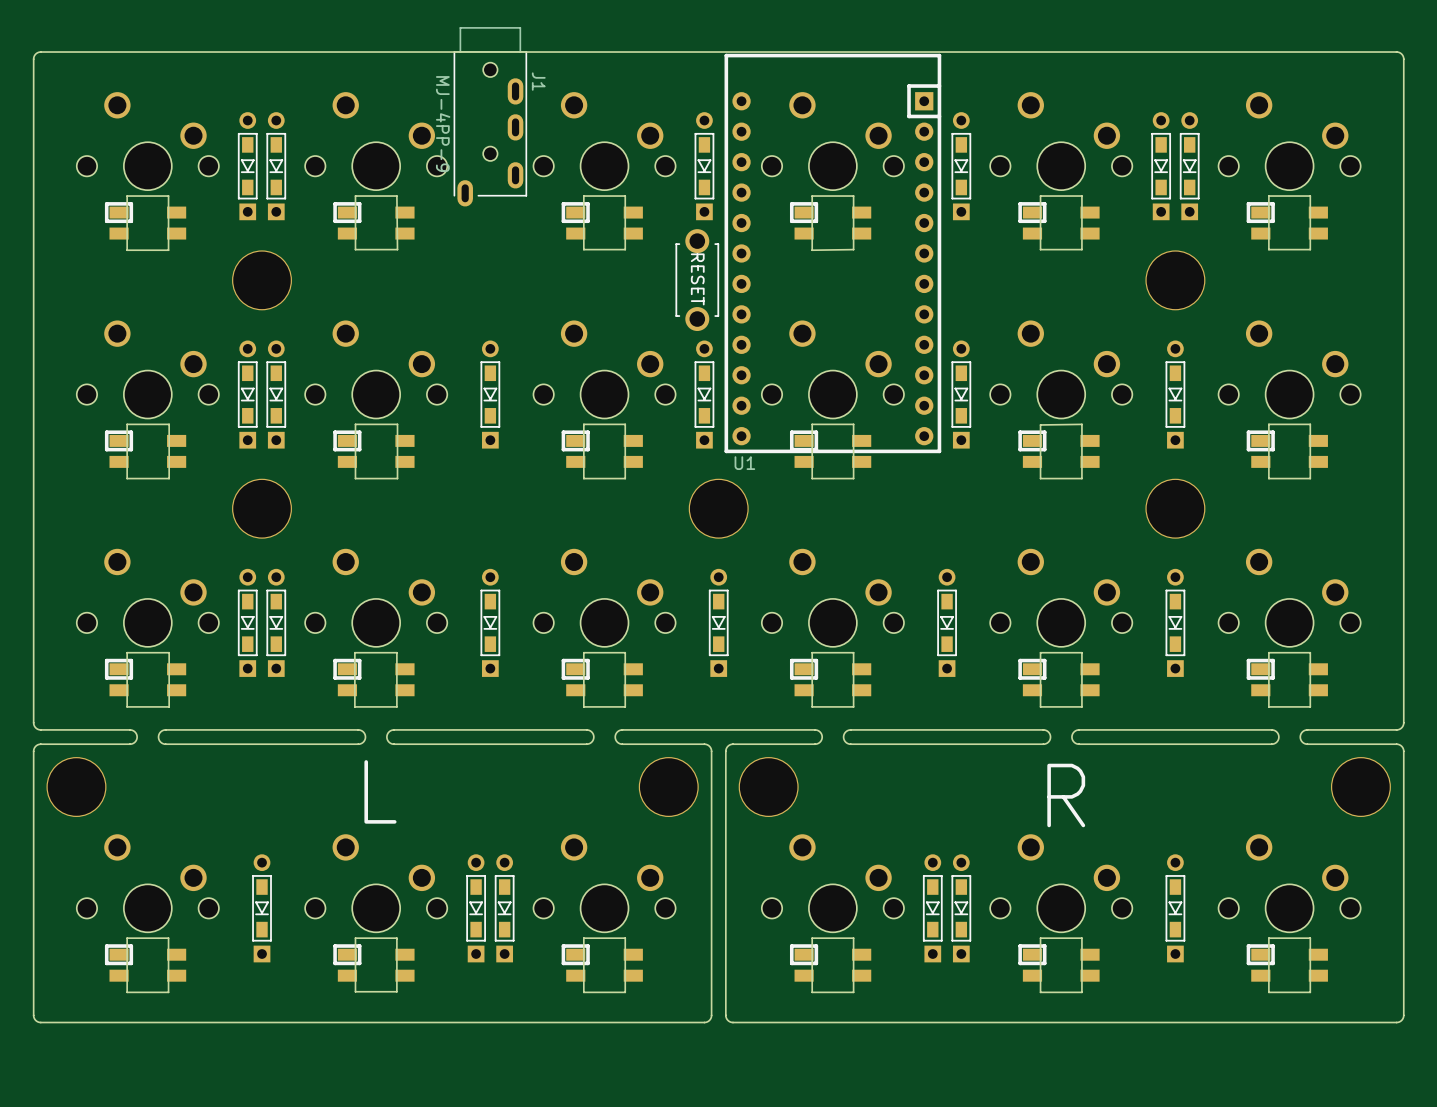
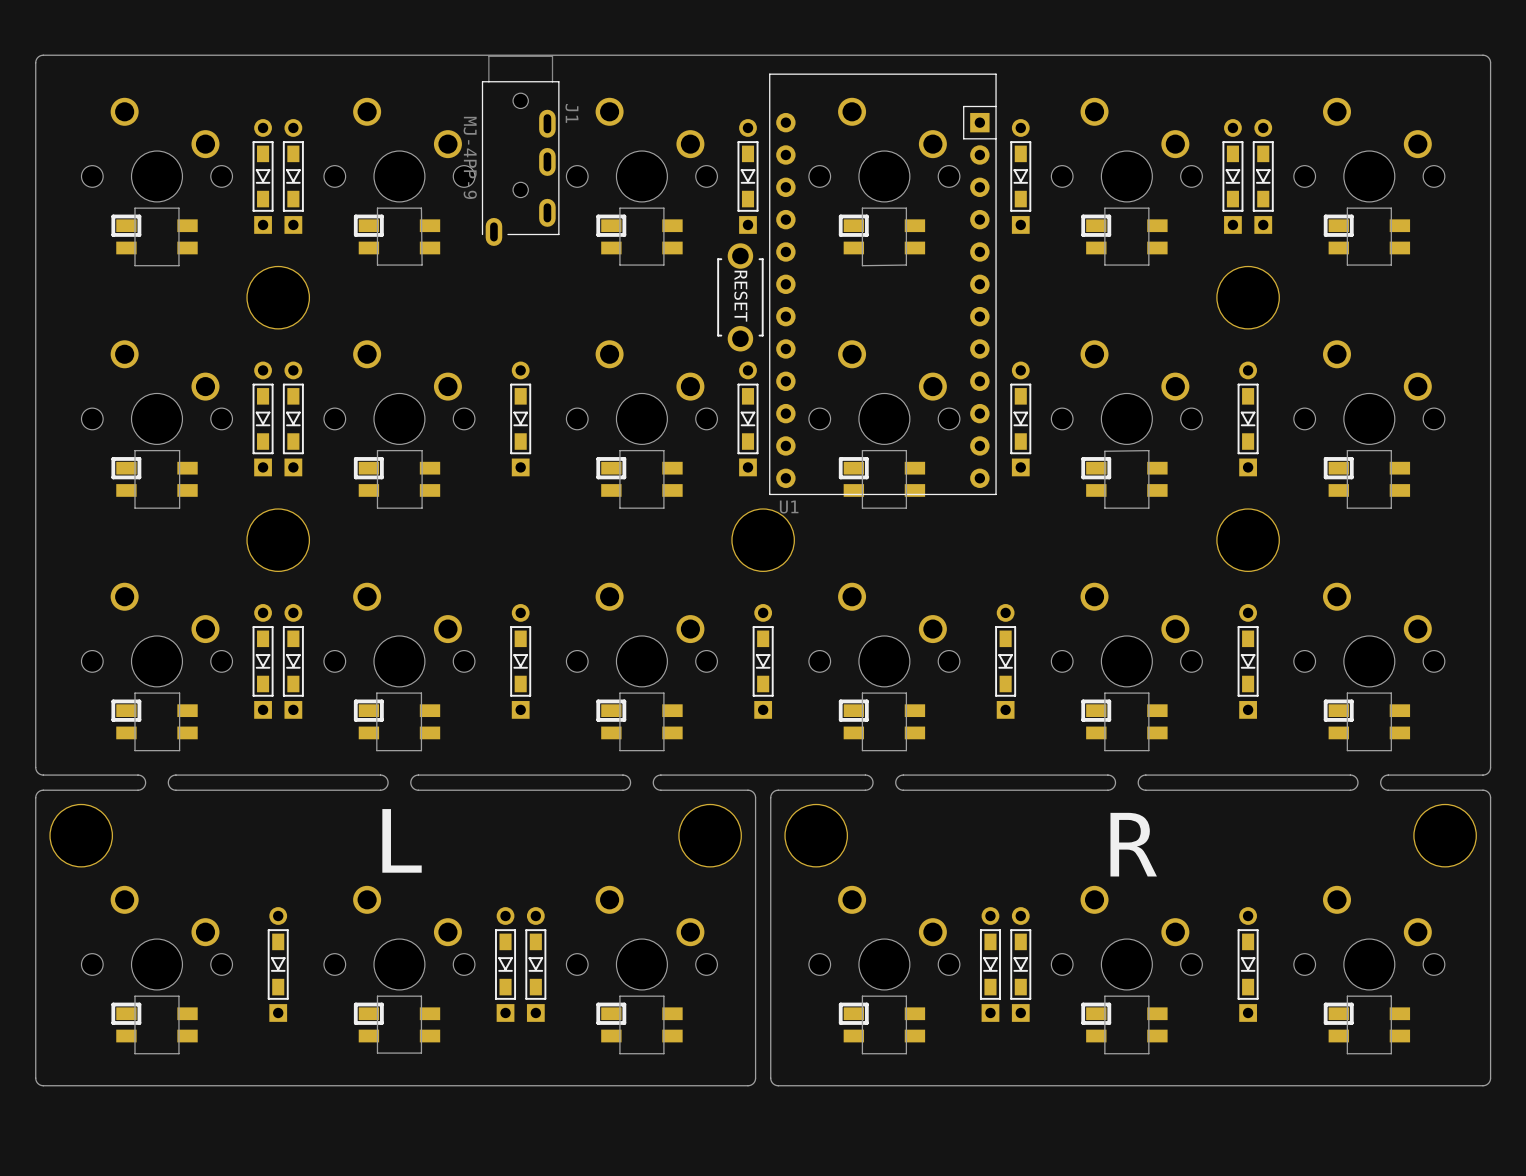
J1 footprint: [453, 27, 527, 207] -> [481, 55, 560, 246]
U1 footprint: [724, 53, 942, 454] -> [769, 73, 997, 496]

